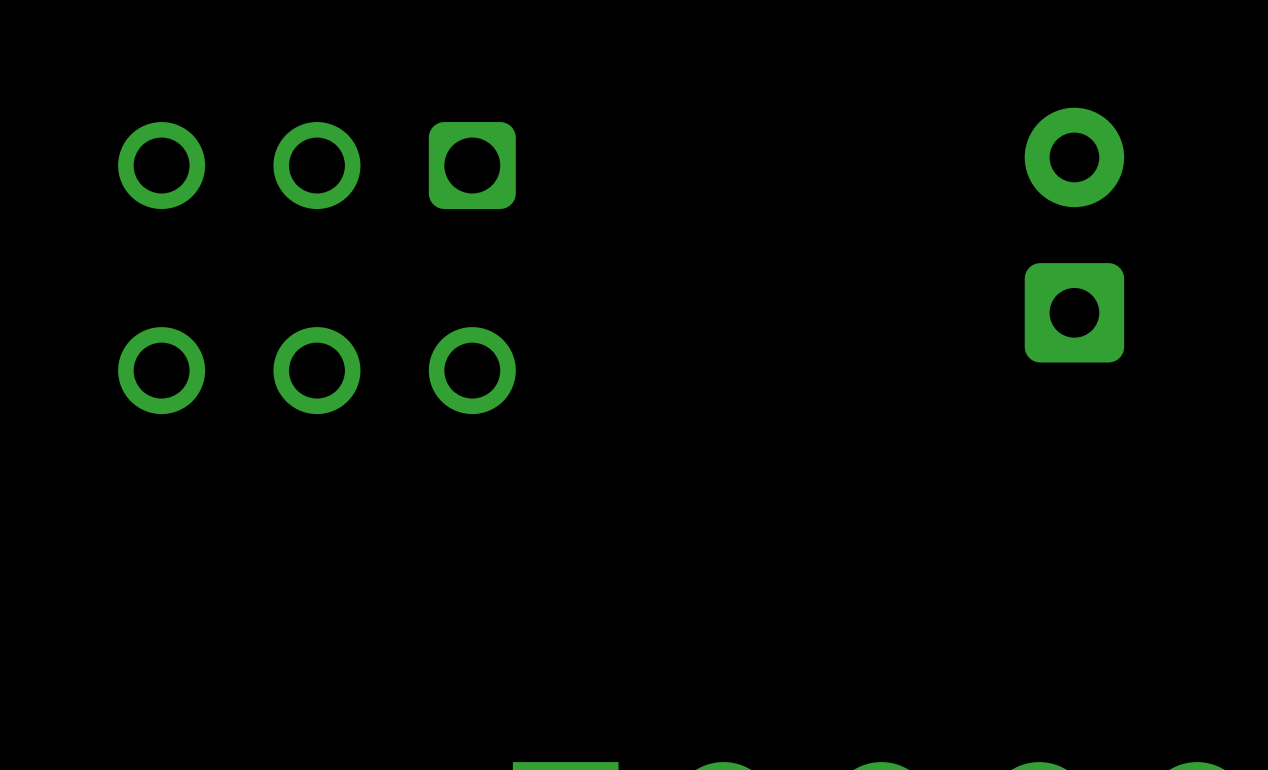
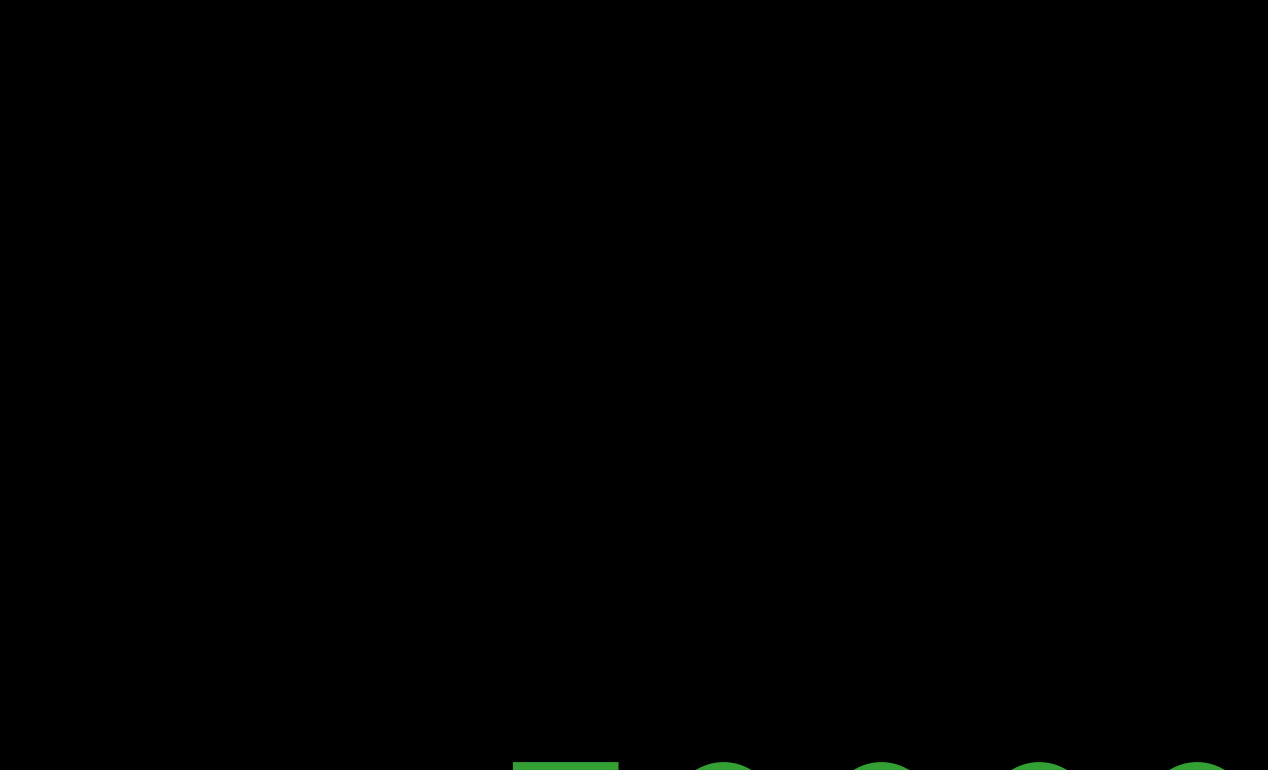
part: (1074, 235) -> none
part: (316, 268) -> none

